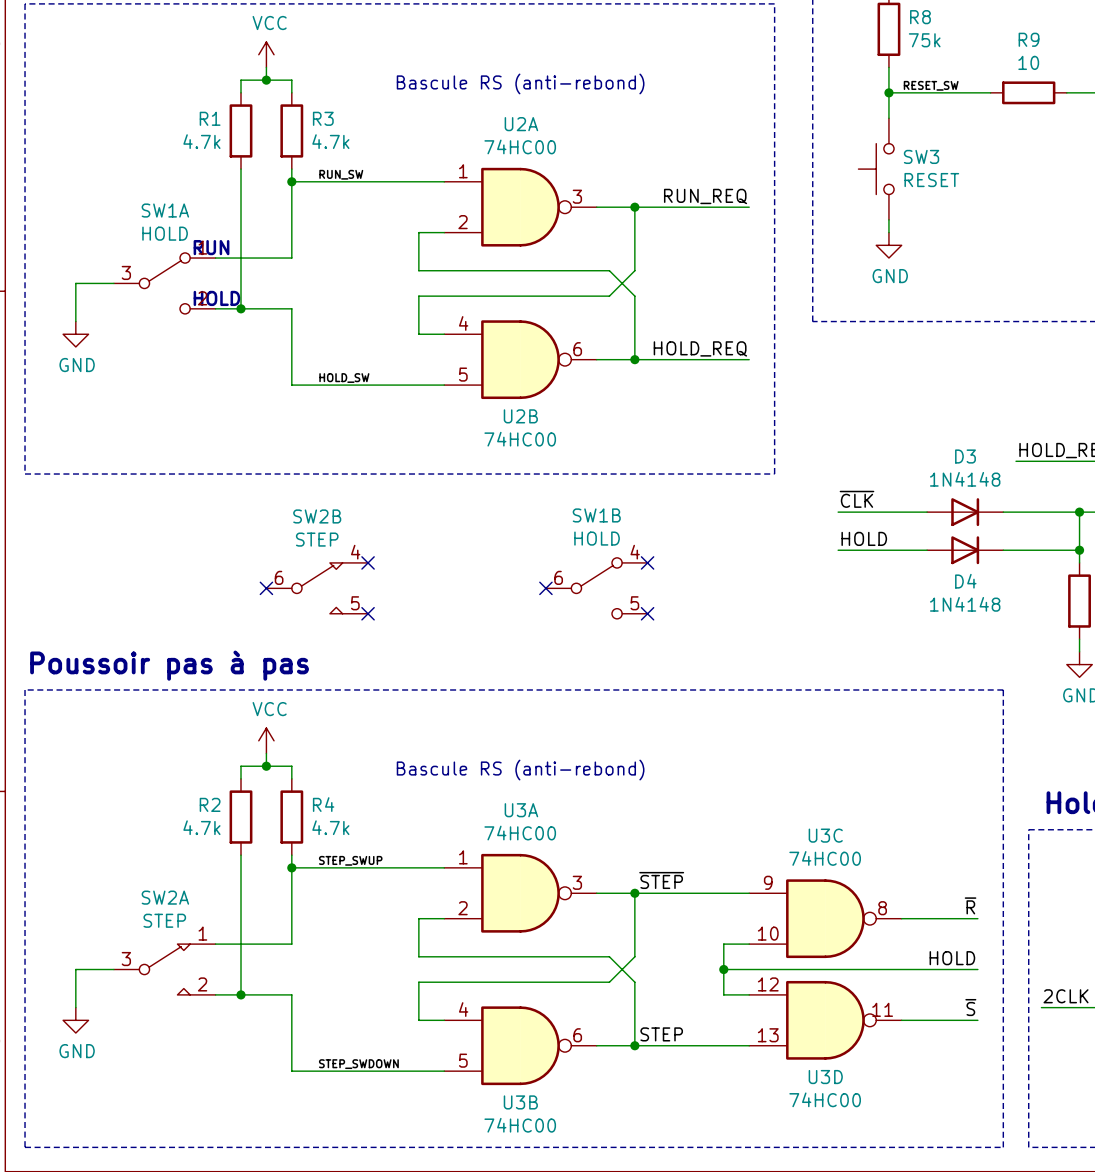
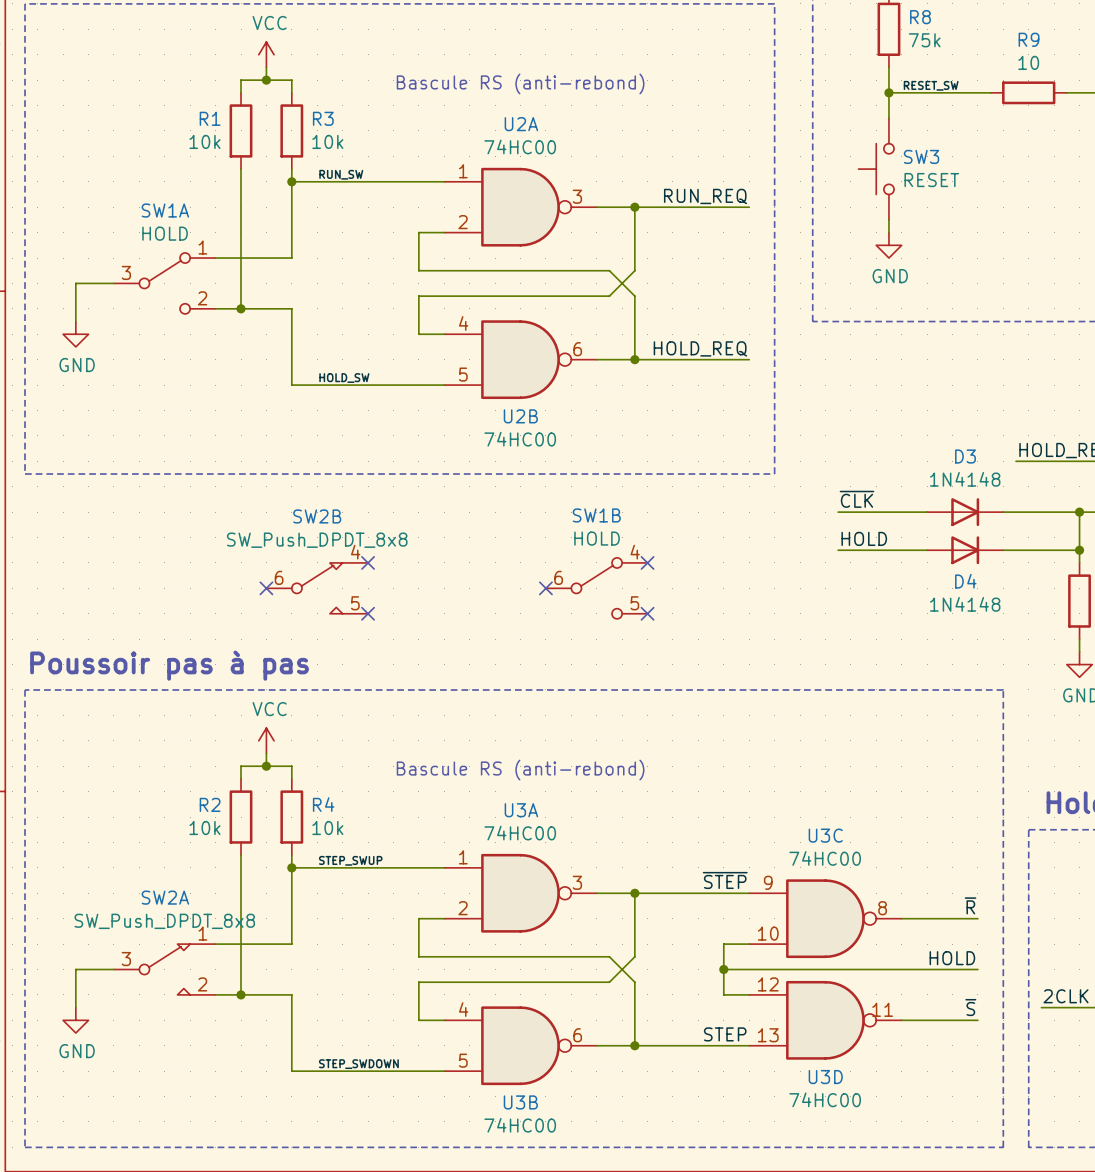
R1 value: 4.7k (201, 141) -> 10k (204, 141)
R3 value: 4.7k (330, 141) -> 10k (327, 141)
text: RUN (211, 247) -> none
text: HOLD (216, 298) -> none
SW2B value: STEP (317, 539) -> SW_Push_DPDT_8x8 (317, 540)
R2 value: 4.7k (201, 827) -> 10k (204, 828)
R4 value: 4.7k (330, 827) -> 10k (327, 828)
label position: ~{STEP} (661, 880) -> ~{STEP} (725, 880)
SW2A value: STEP (164, 920) -> SW_Push_DPDT_8x8 (164, 921)
label position: STEP (661, 1034) -> STEP (725, 1034)

